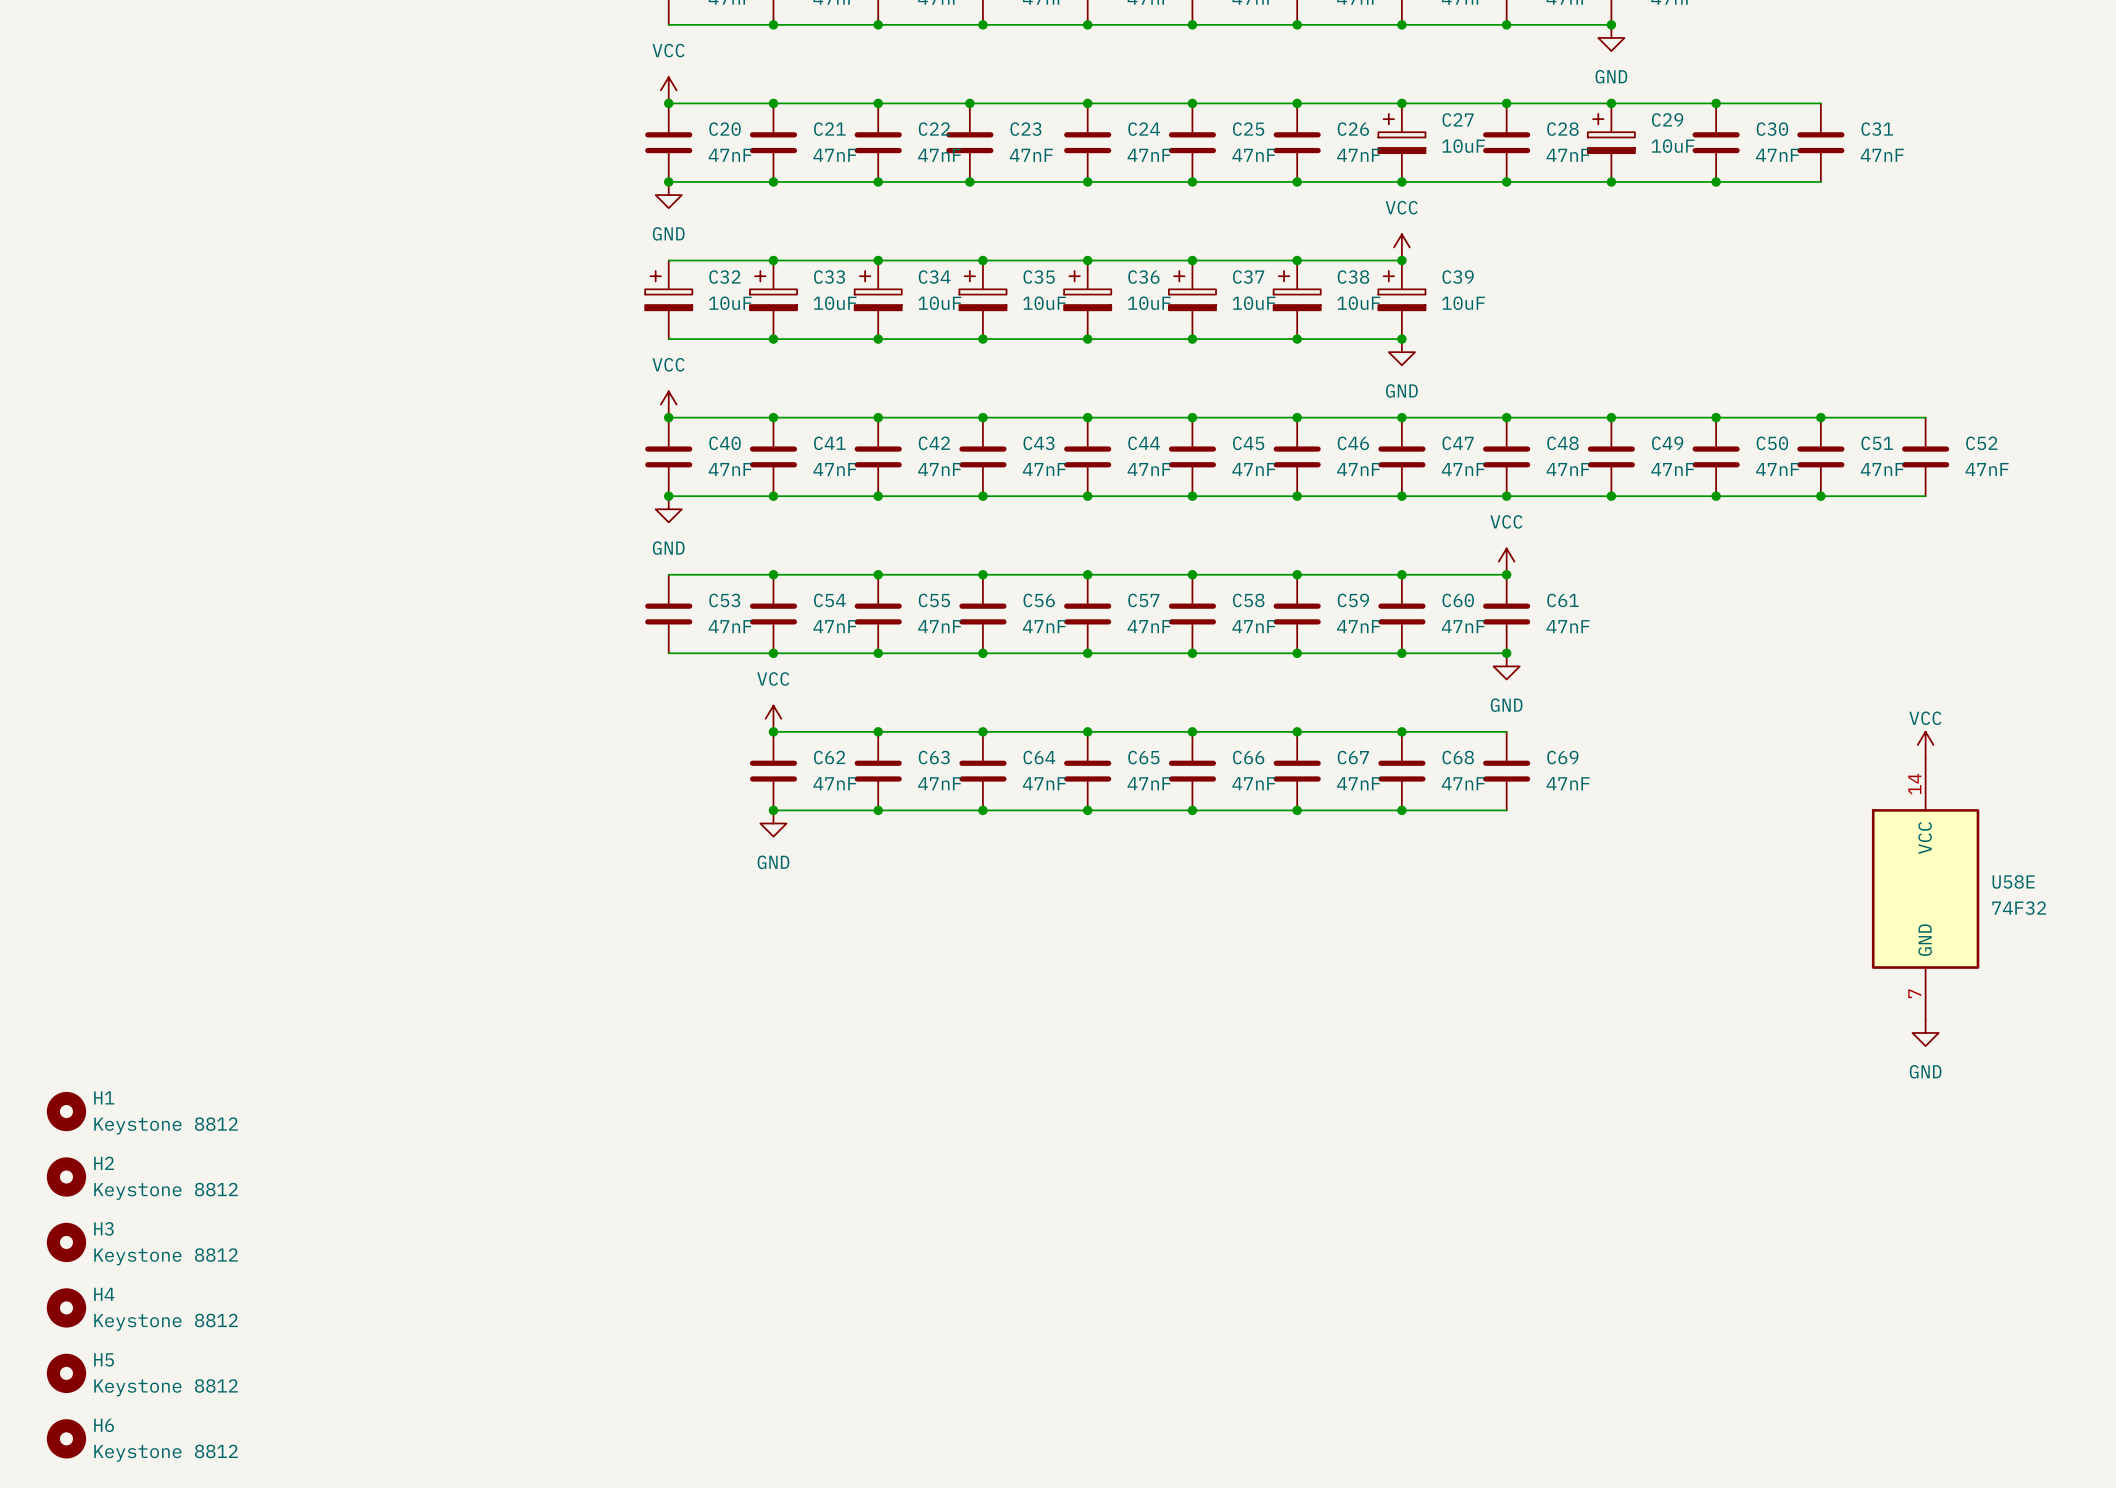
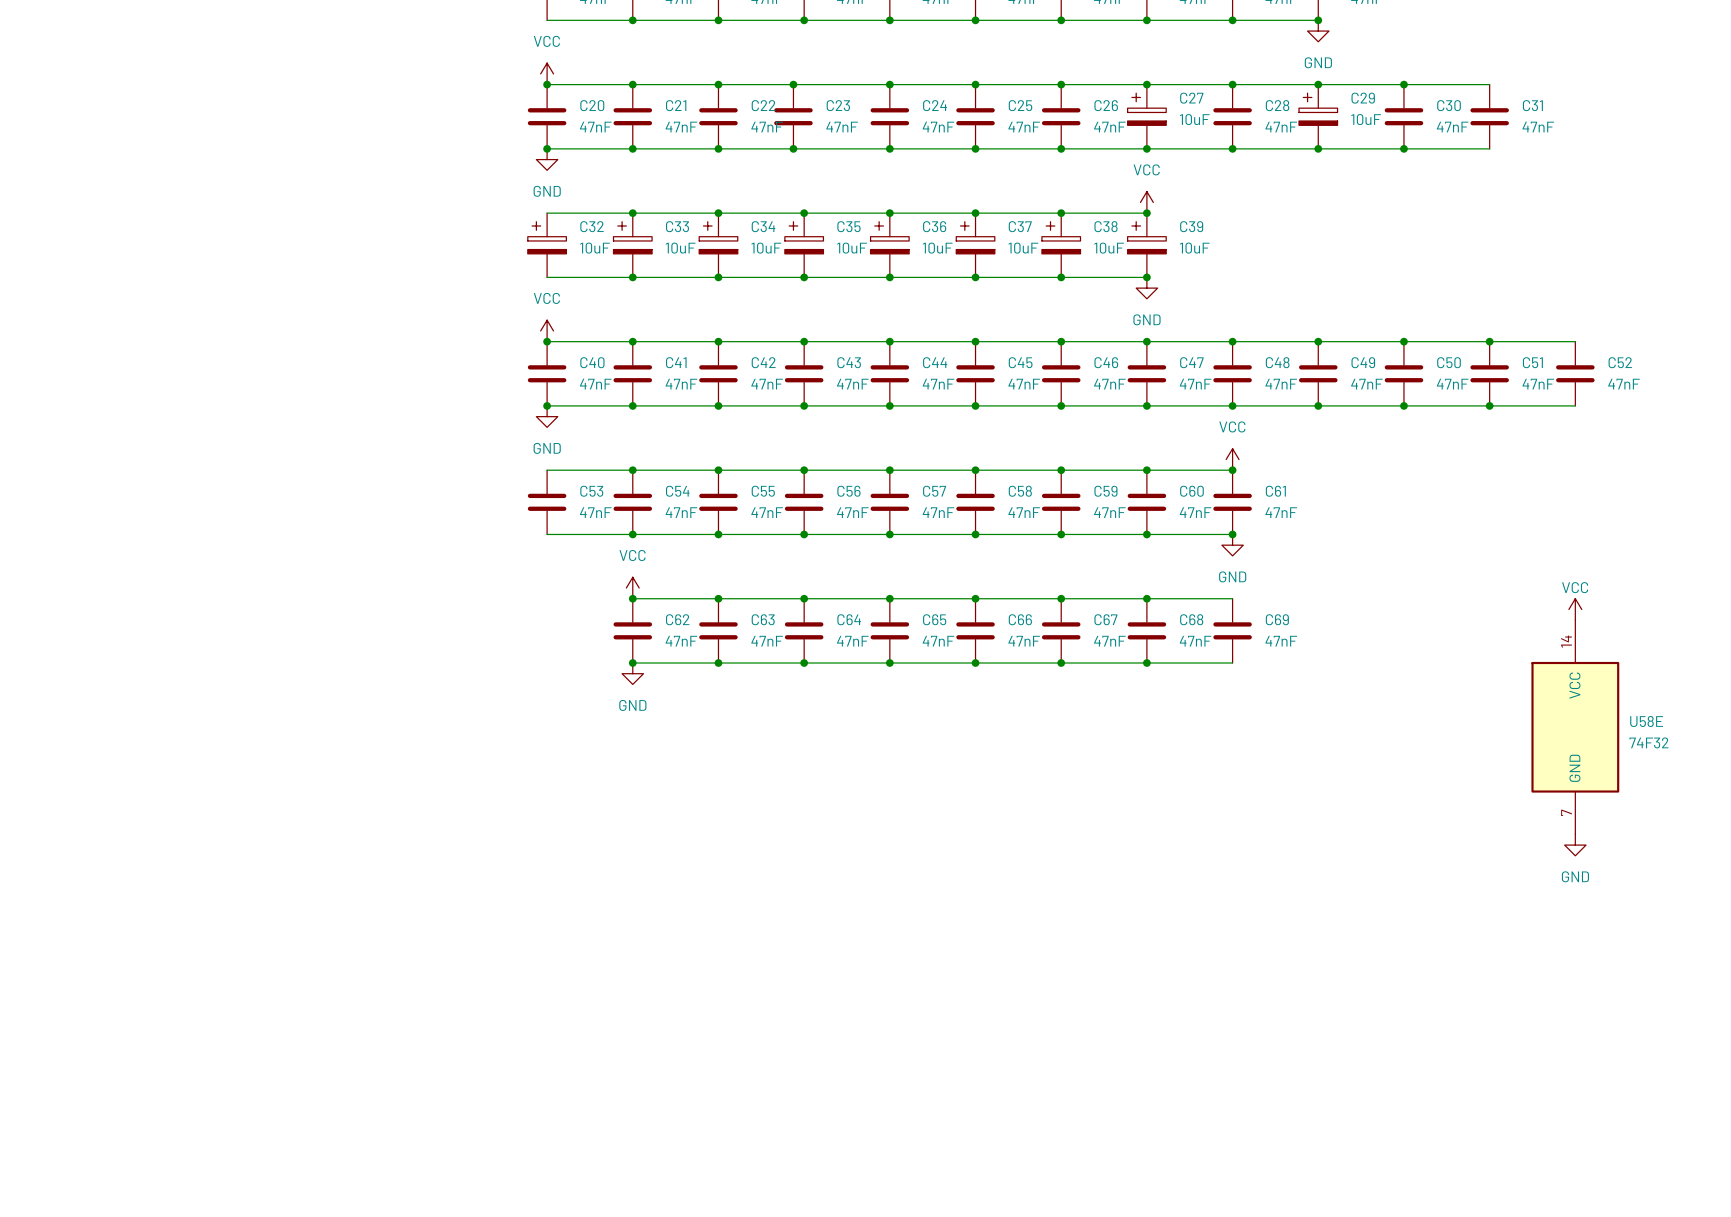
H1: Keystone 8812 (66, 1111) -> none
H2: Keystone 8812 (66, 1176) -> none
H3: Keystone 8812 (66, 1242) -> none
H4: Keystone 8812 (66, 1307) -> none
H5: Keystone 8812 (66, 1373) -> none
H6: Keystone 8812 (66, 1438) -> none

